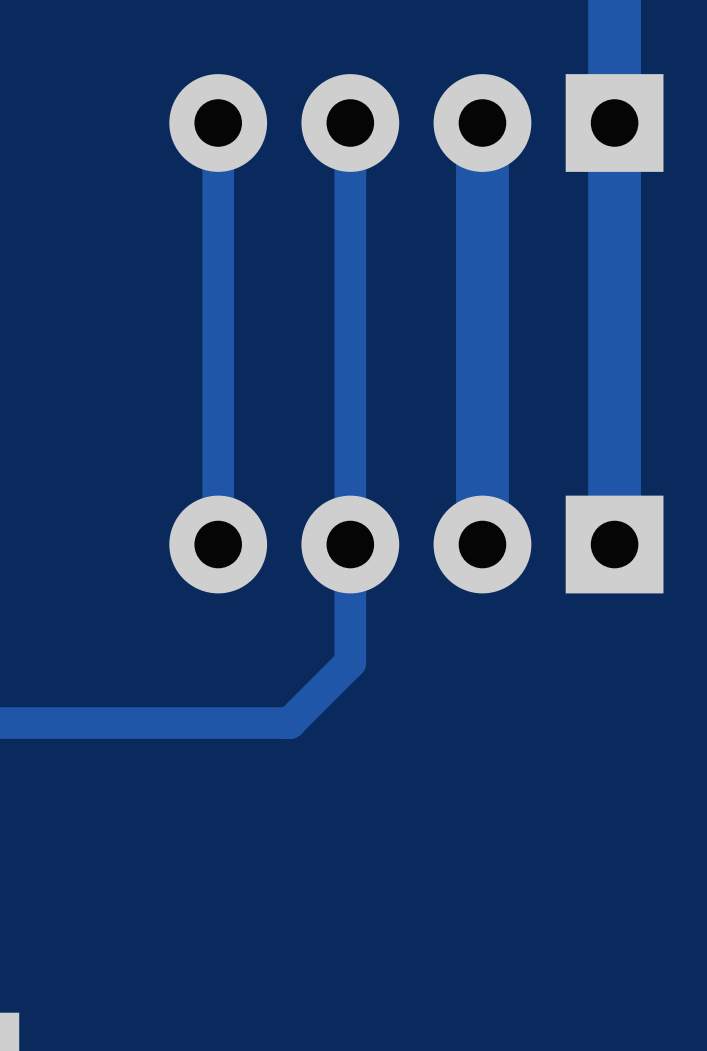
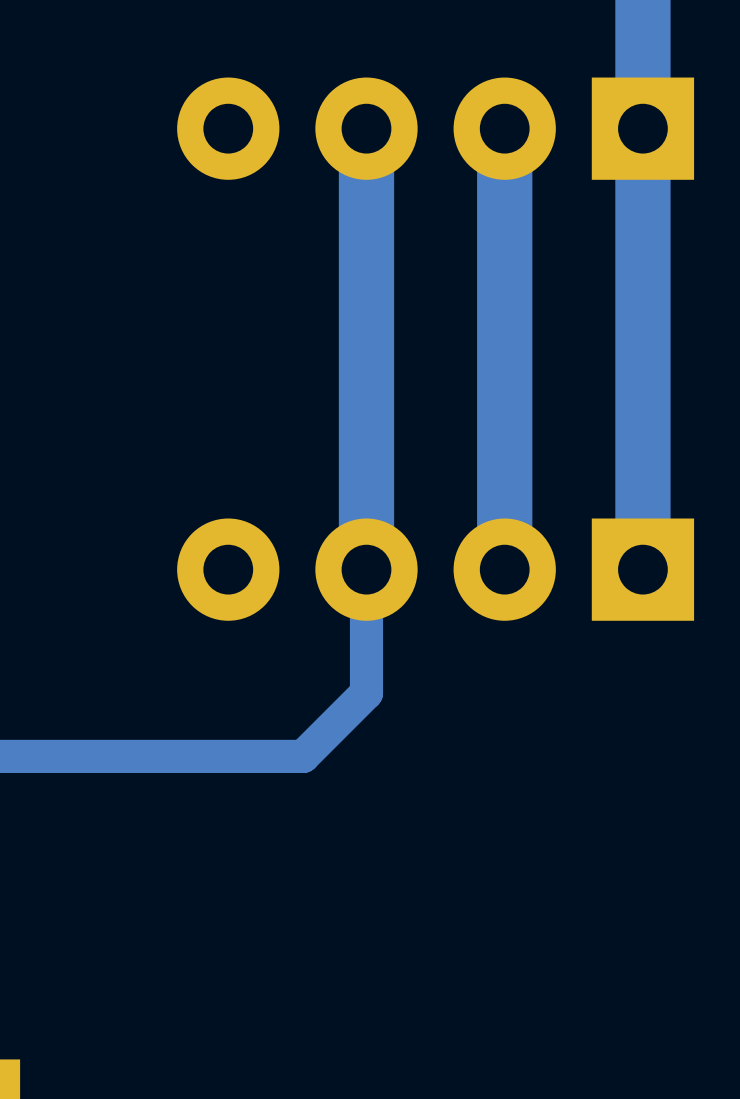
track: (218, 122) (218, 544) -> none
track width: thin (350, 122) (350, 544) -> thick (366, 128) (366, 569)

